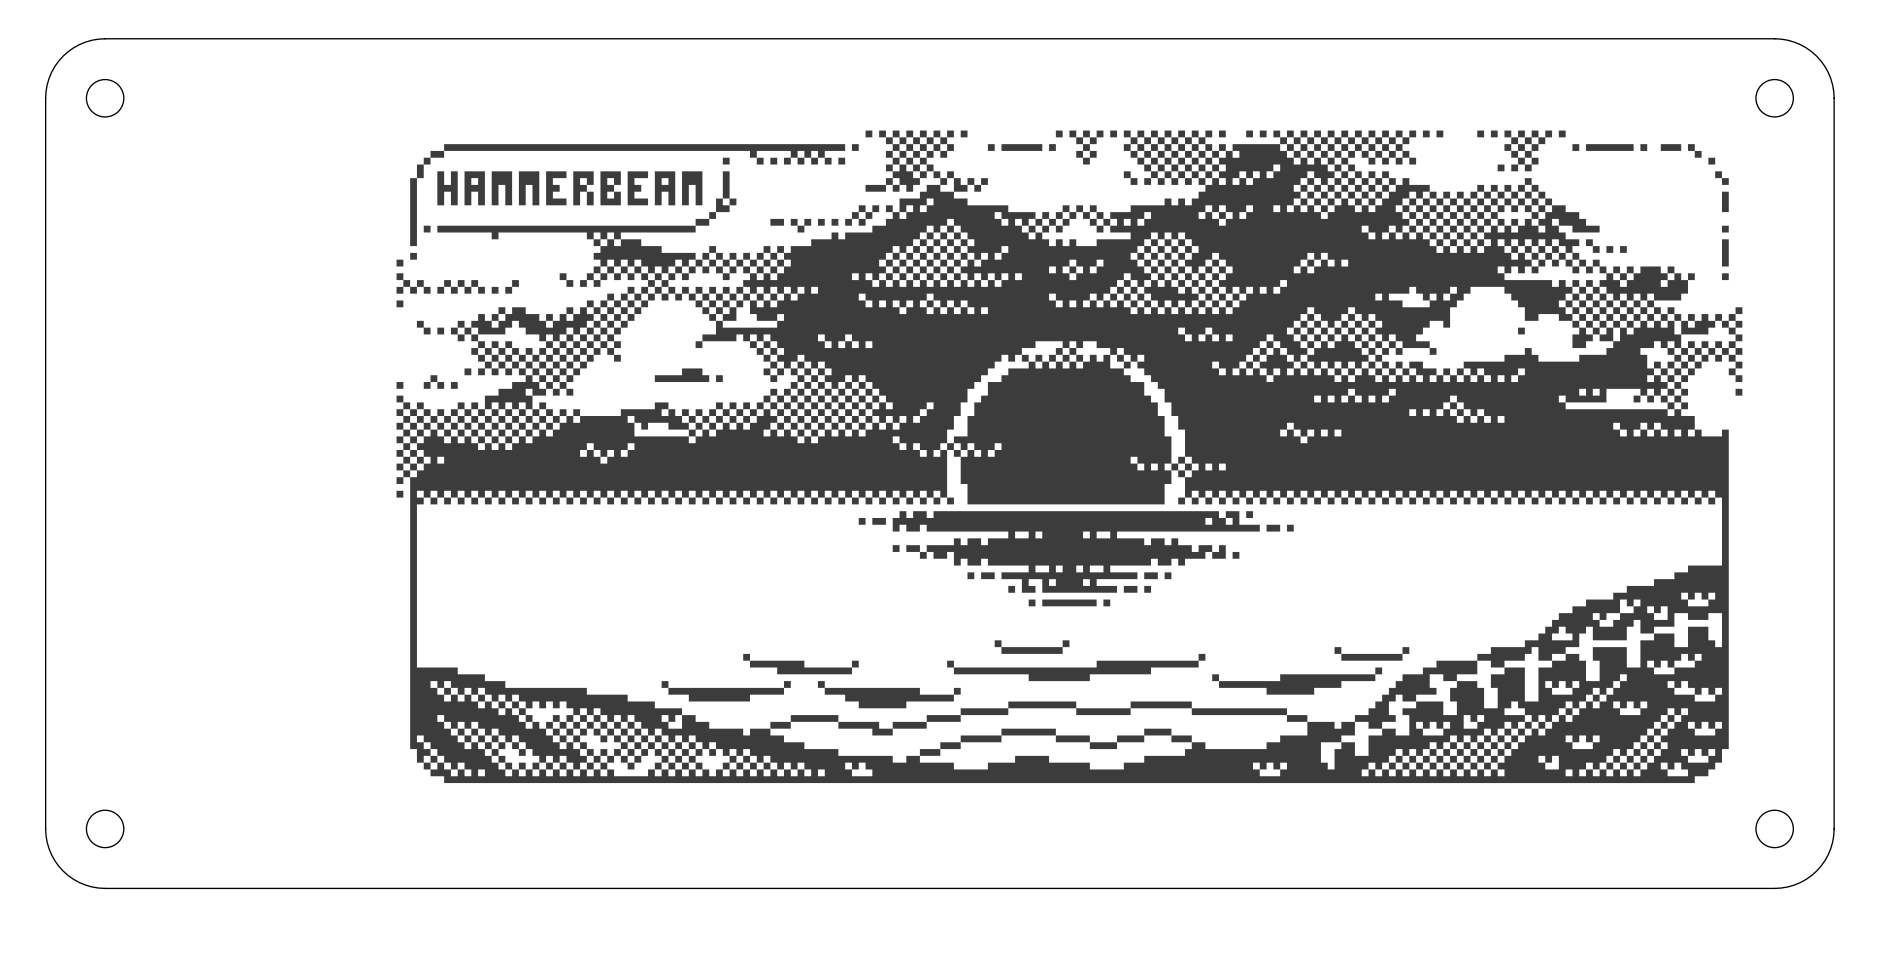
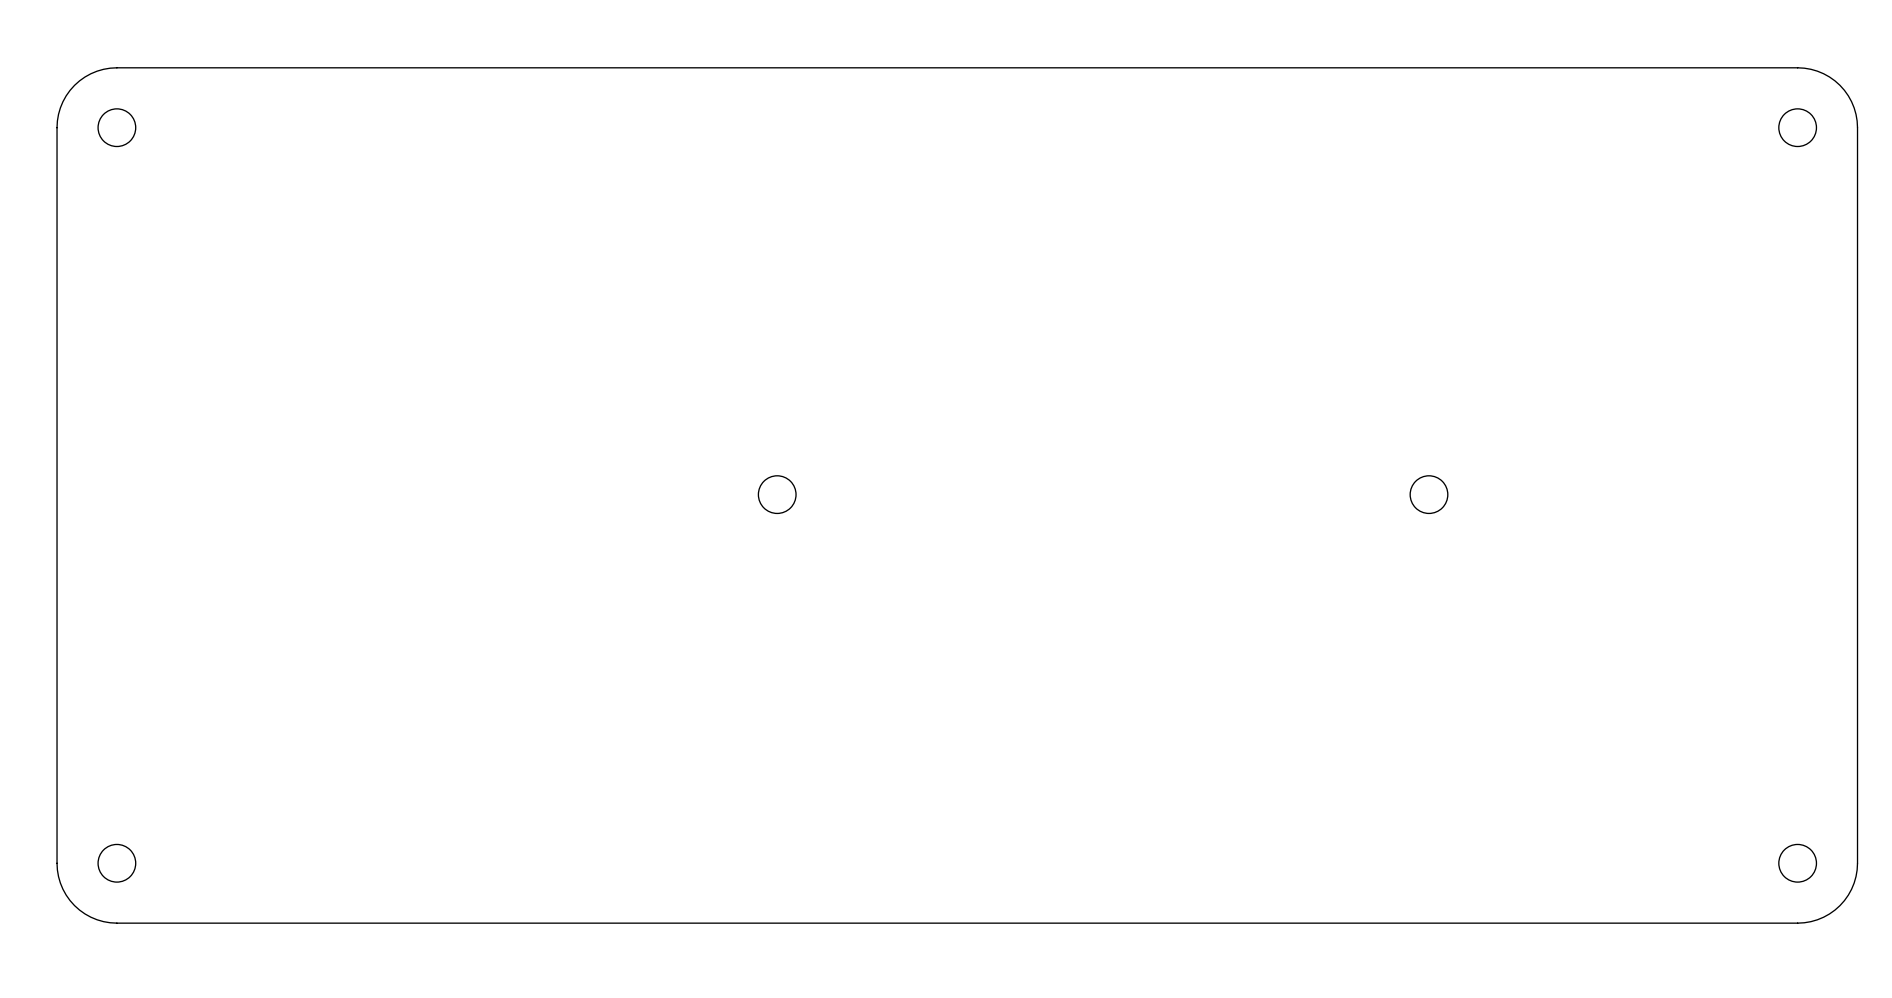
drawing: [396, 130, 1743, 784] -> none

